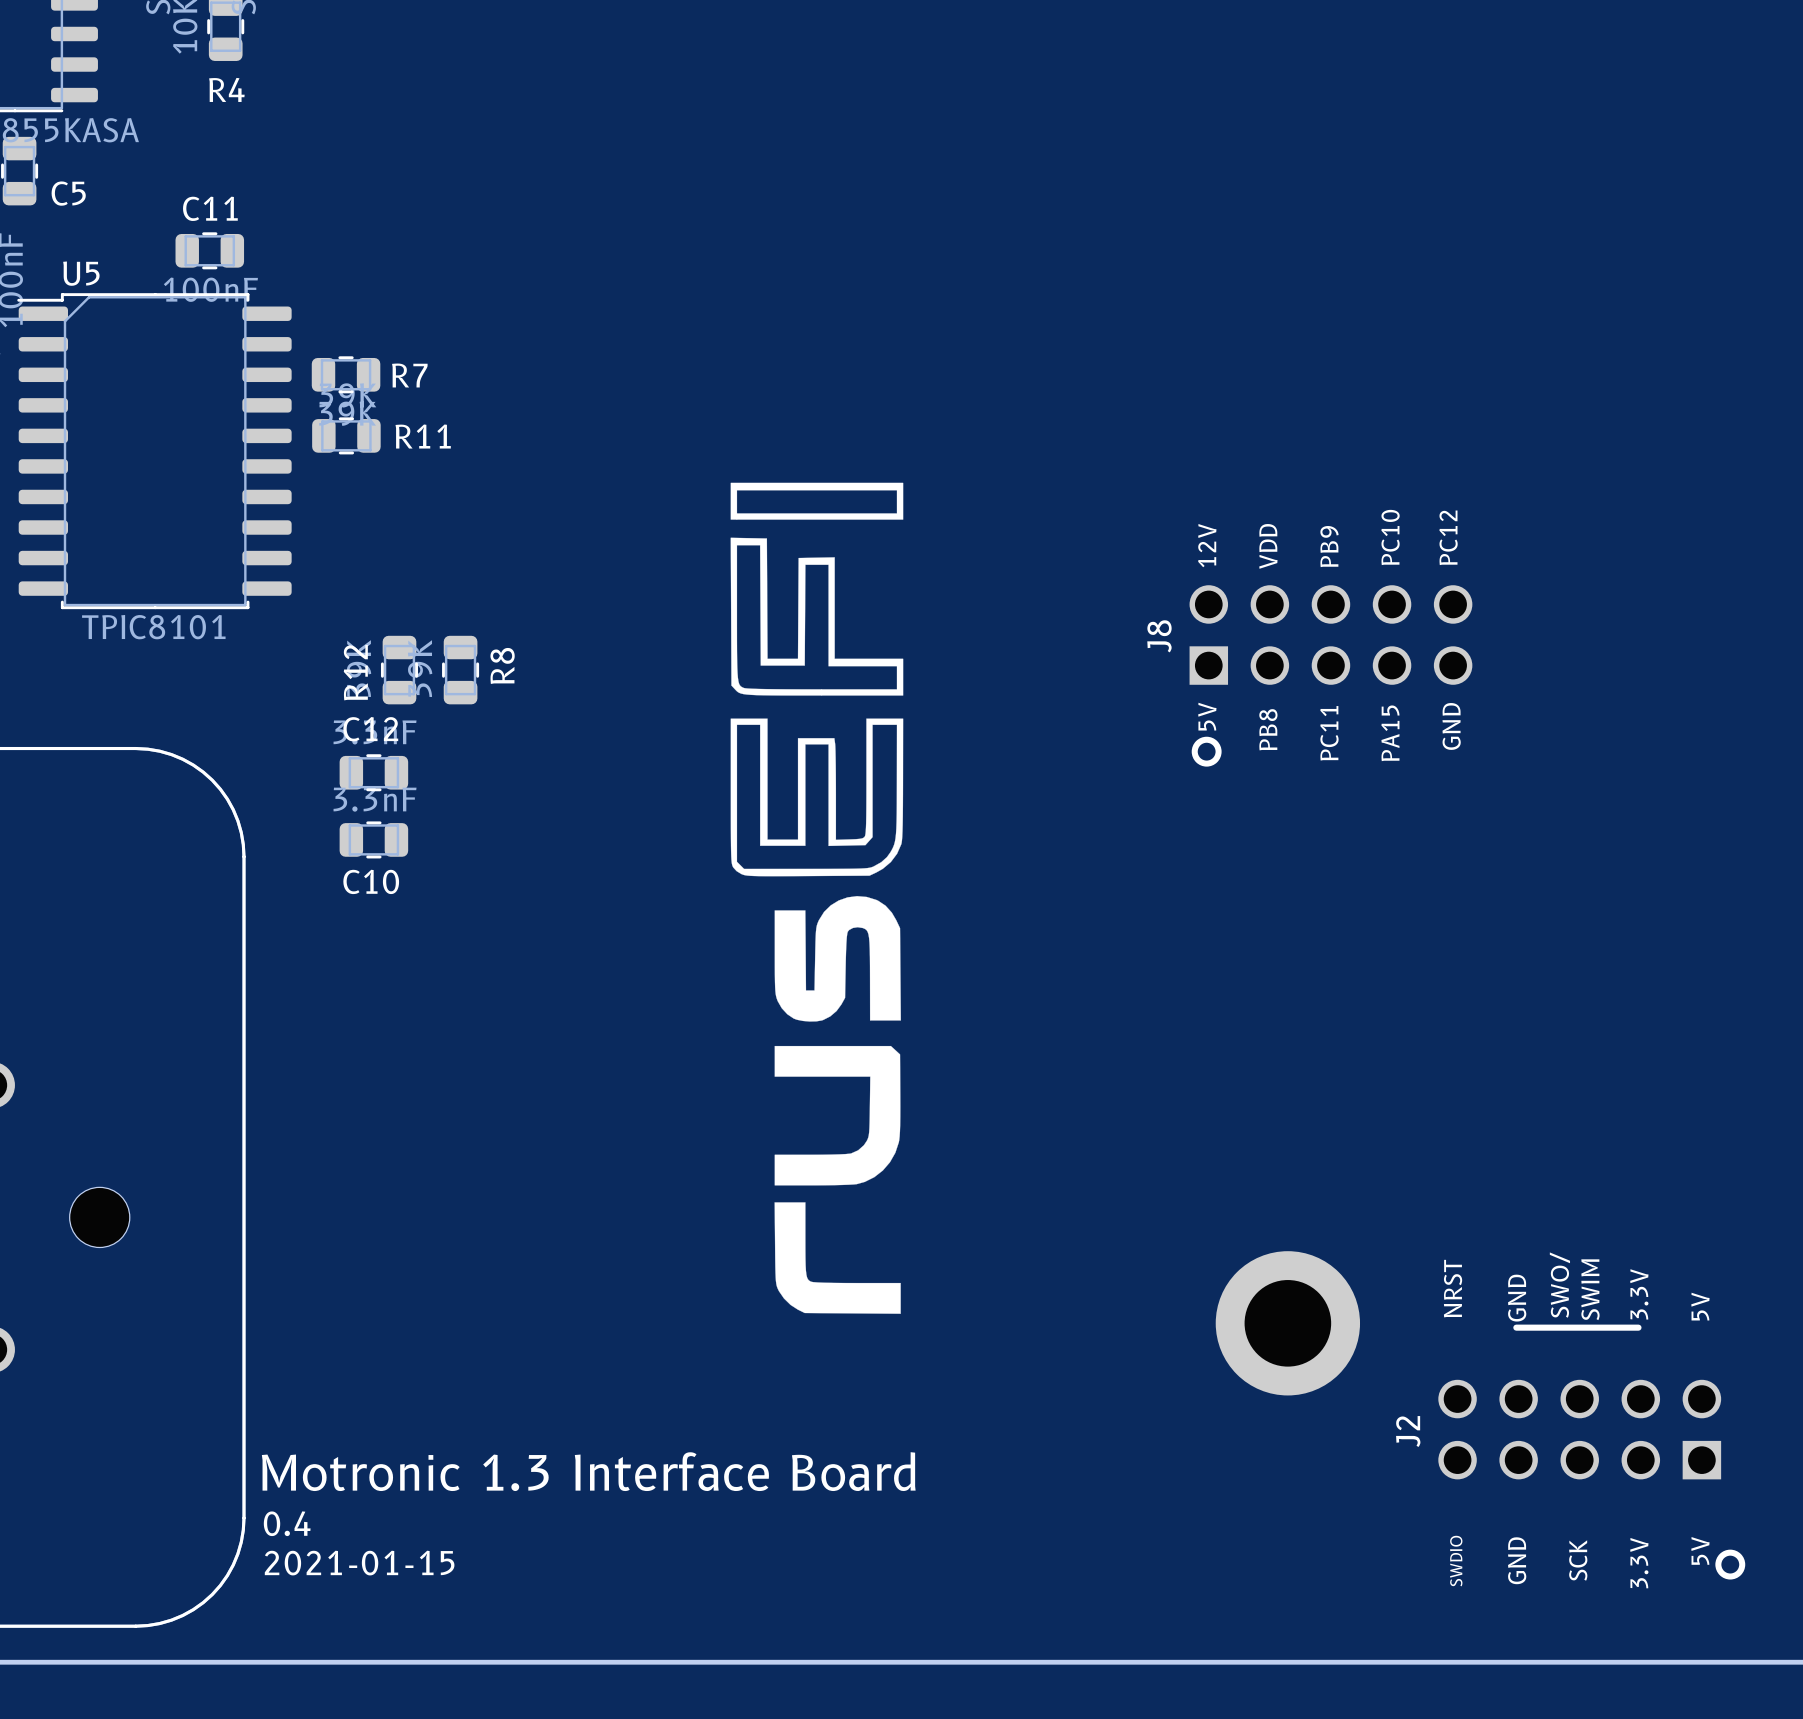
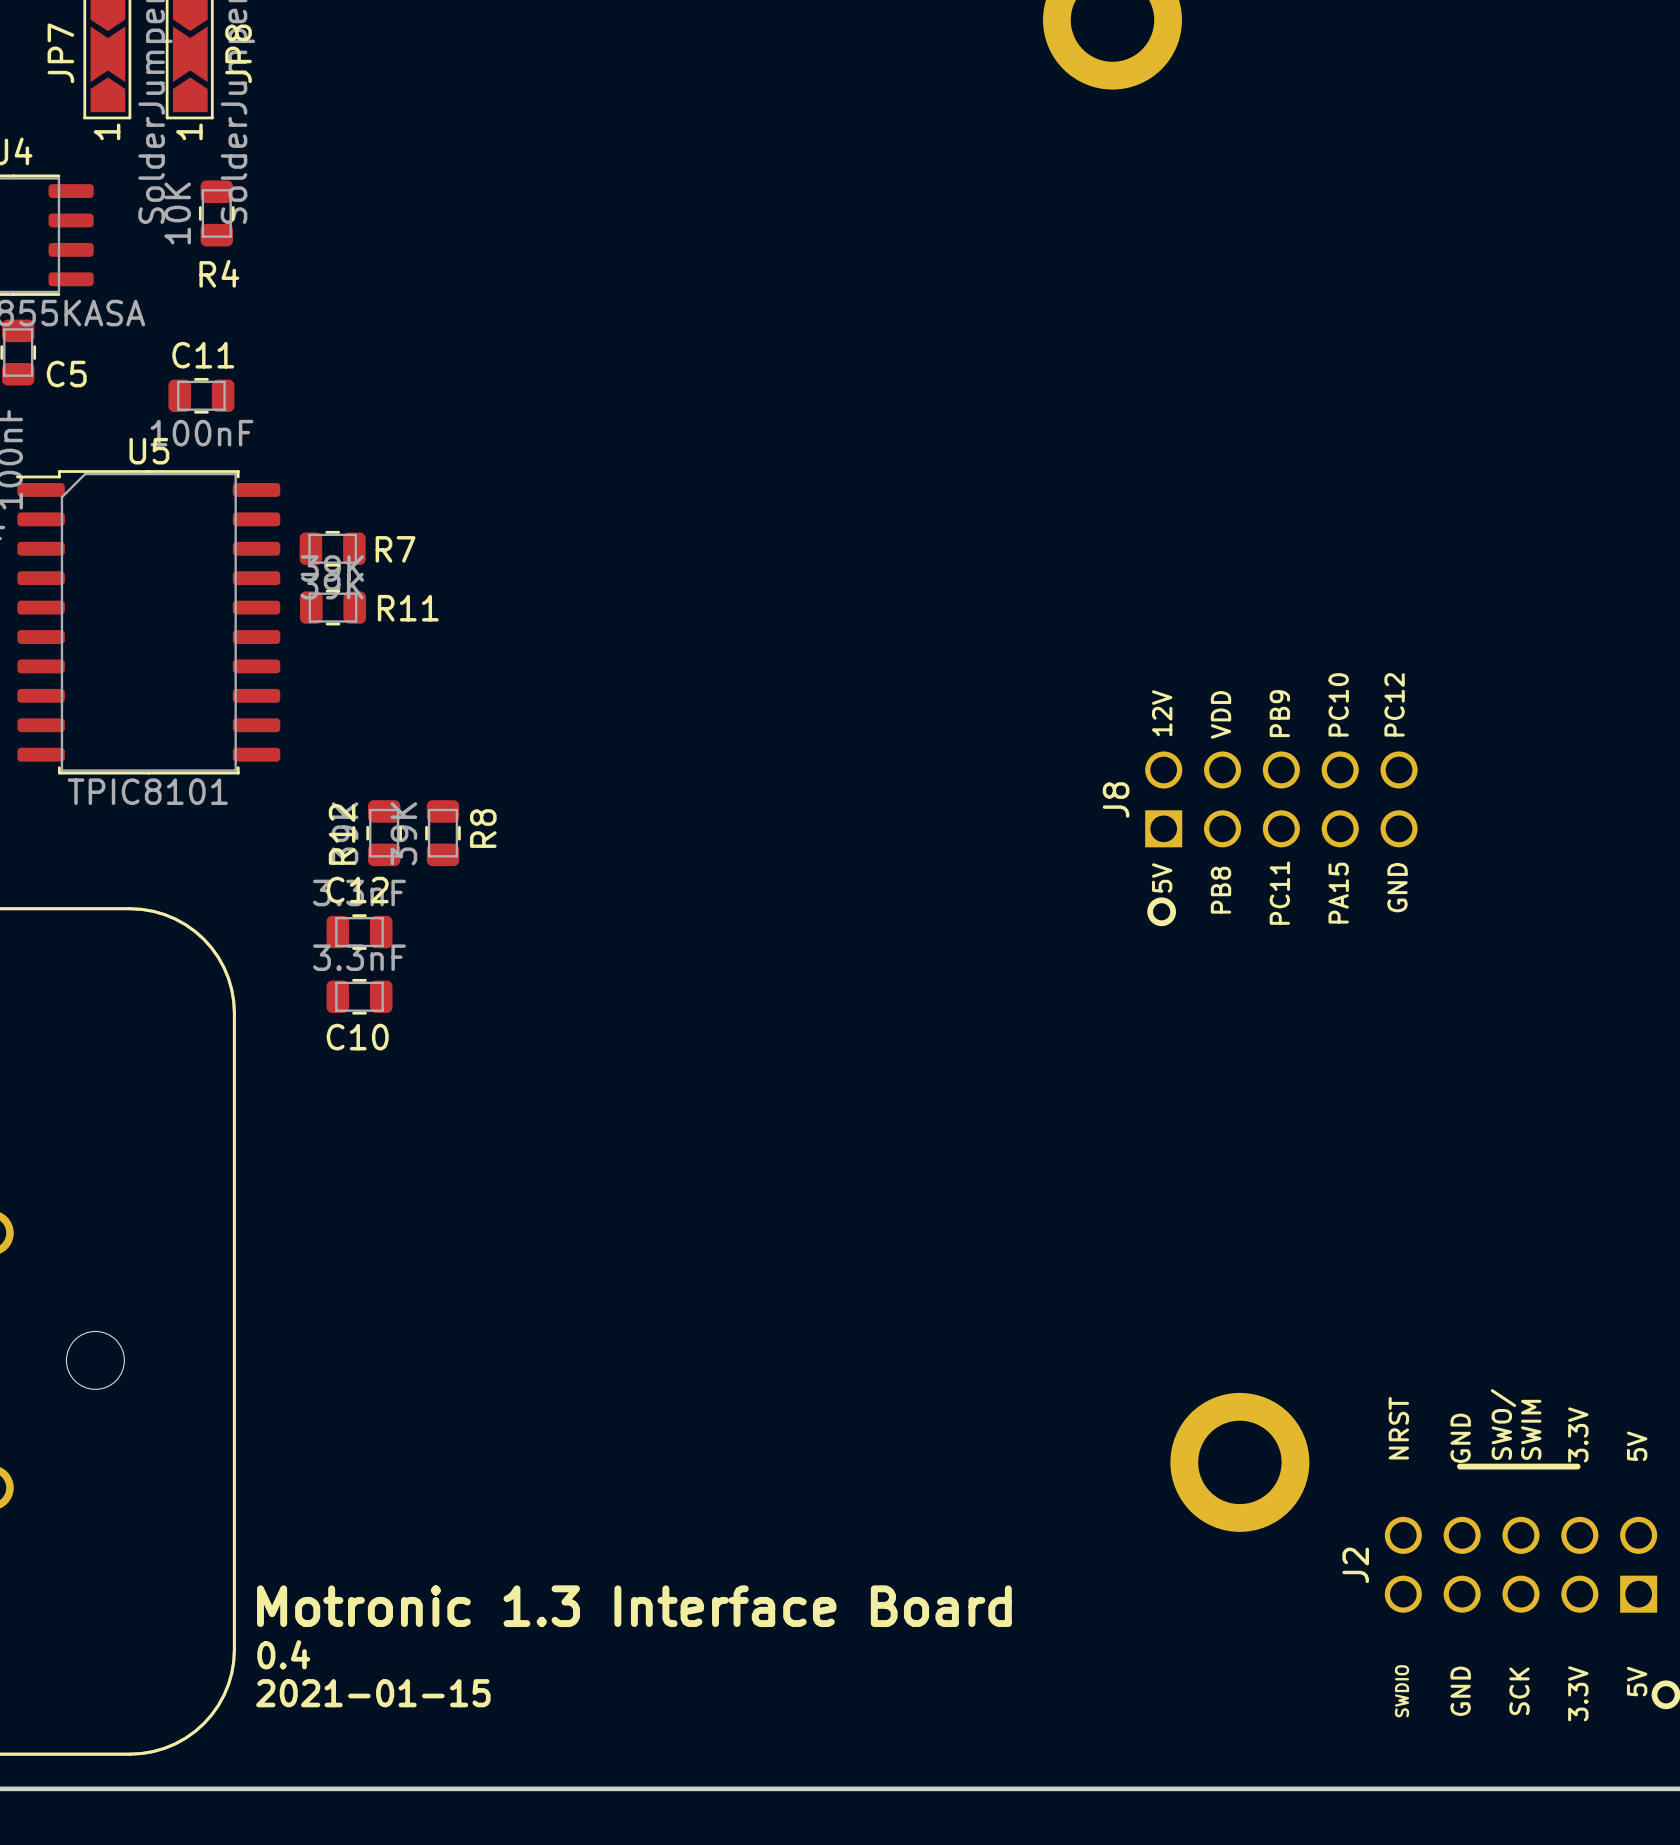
C11 position: (209, 250) -> (201, 395)
U5 name position: U5 (81, 273) -> U5 (149, 451)
drawing: [730, 482, 904, 1314] -> none

